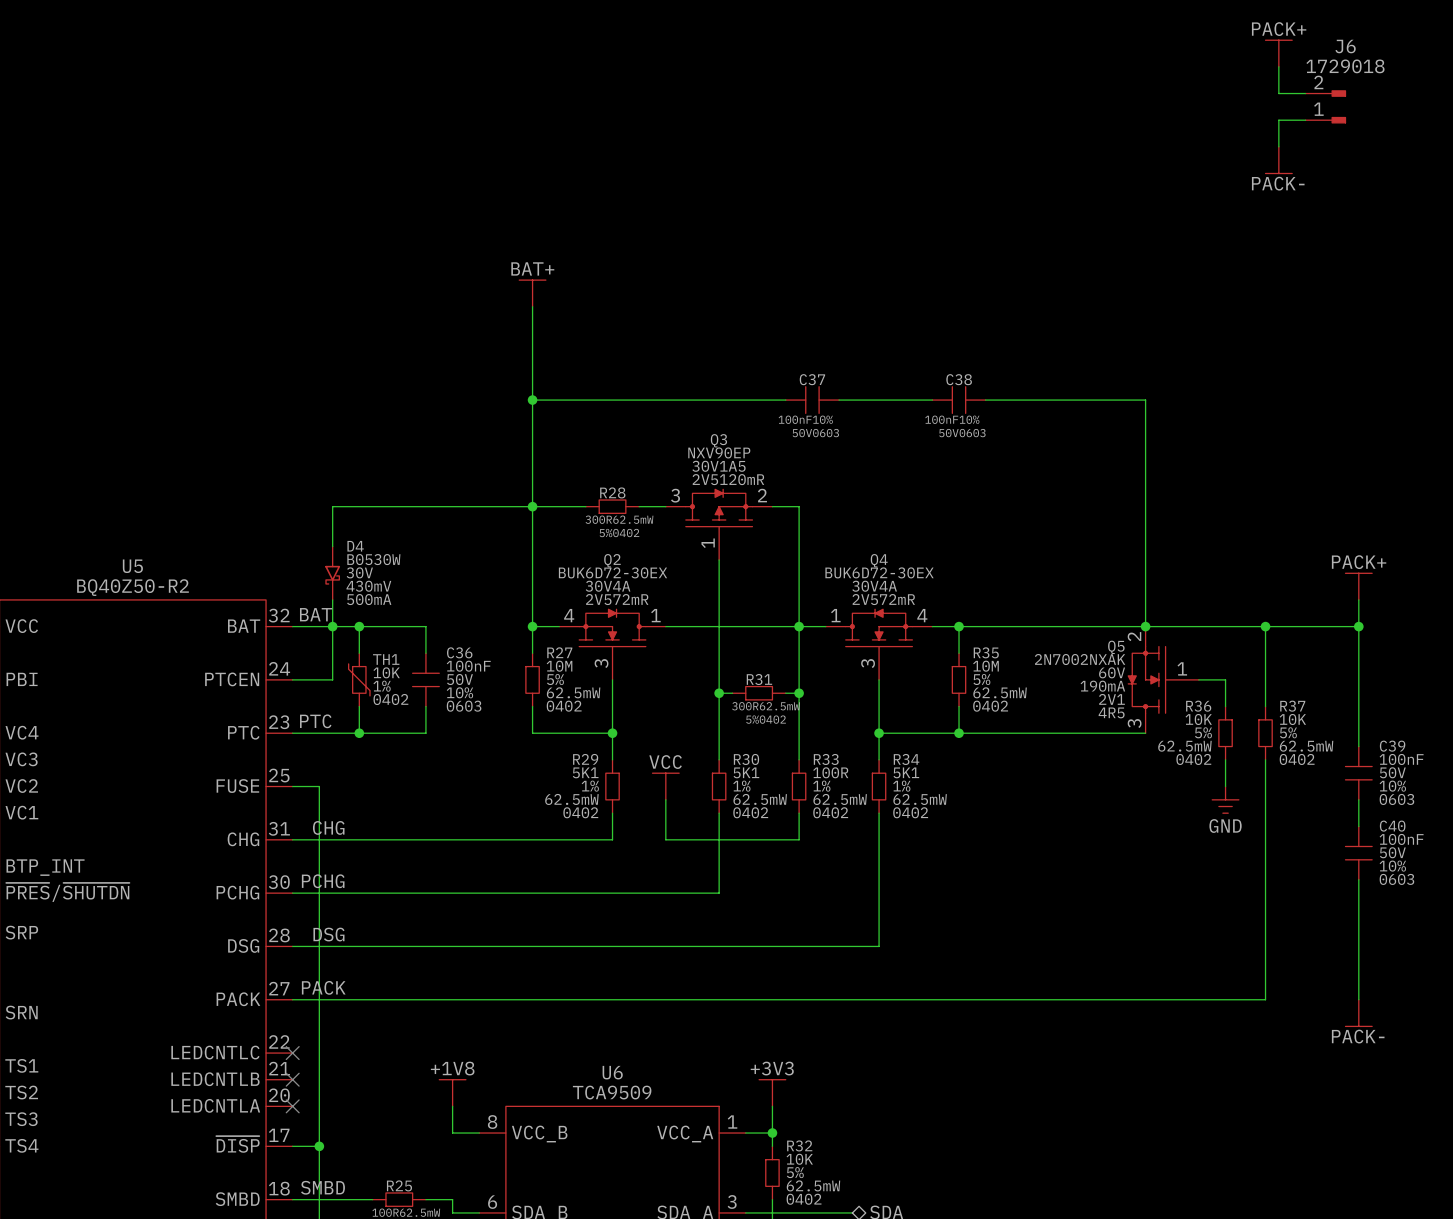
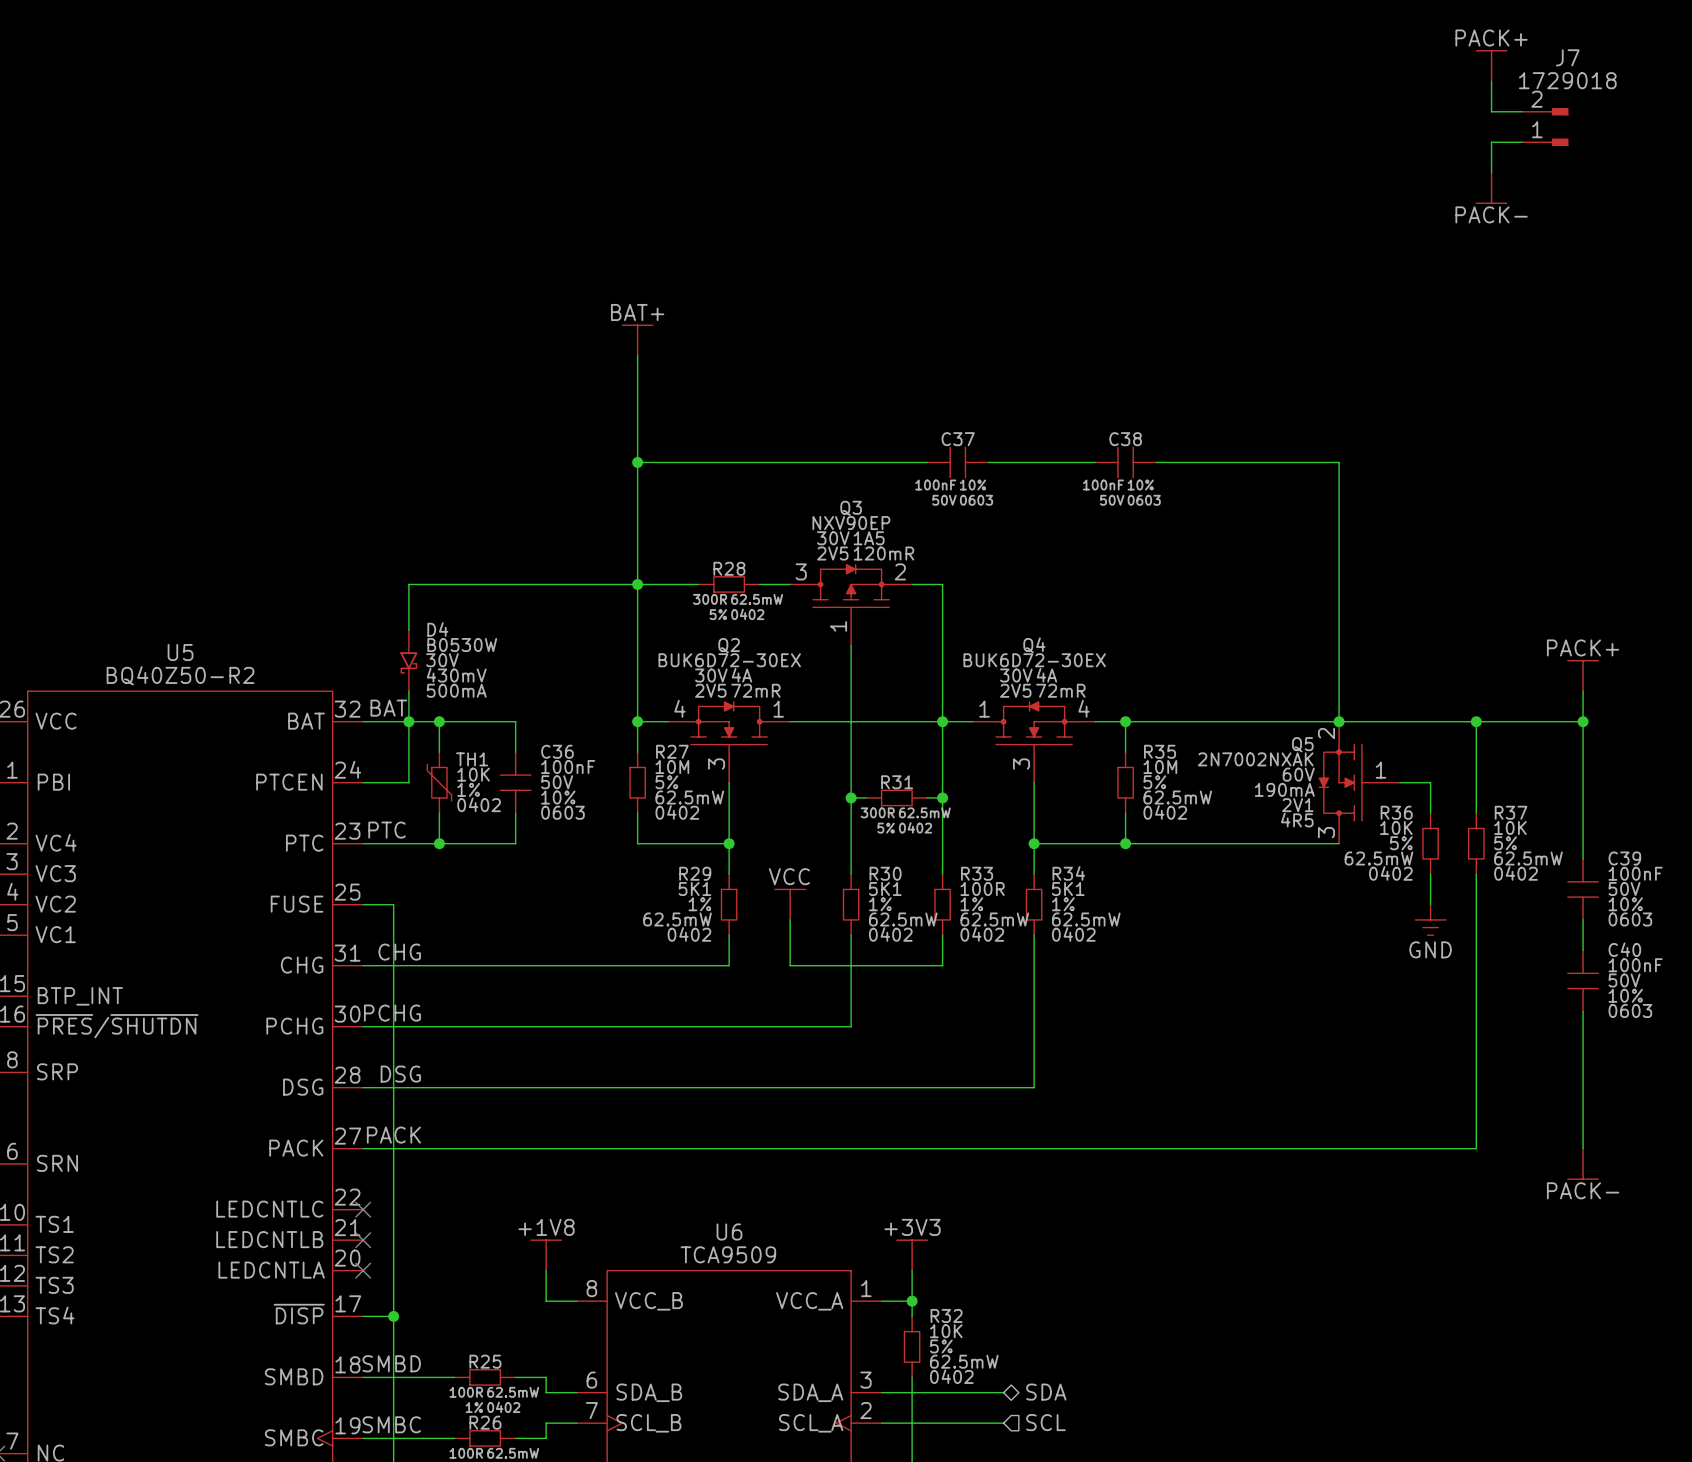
J6 name: J6 (1345, 46) -> J7 (1567, 57)

